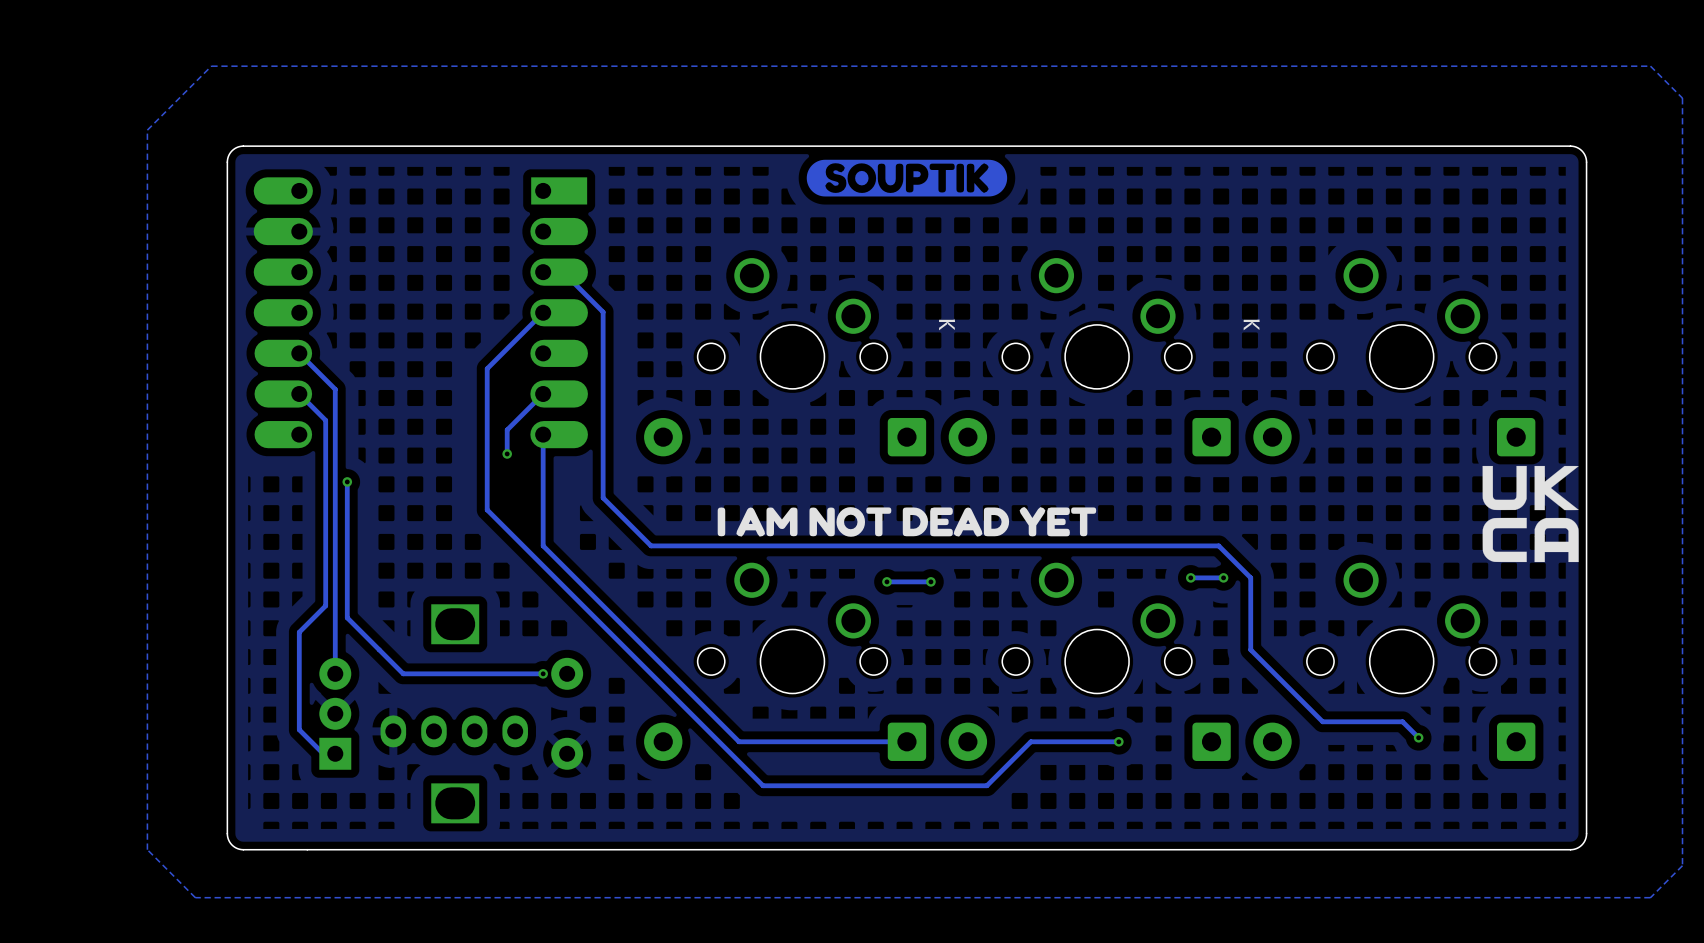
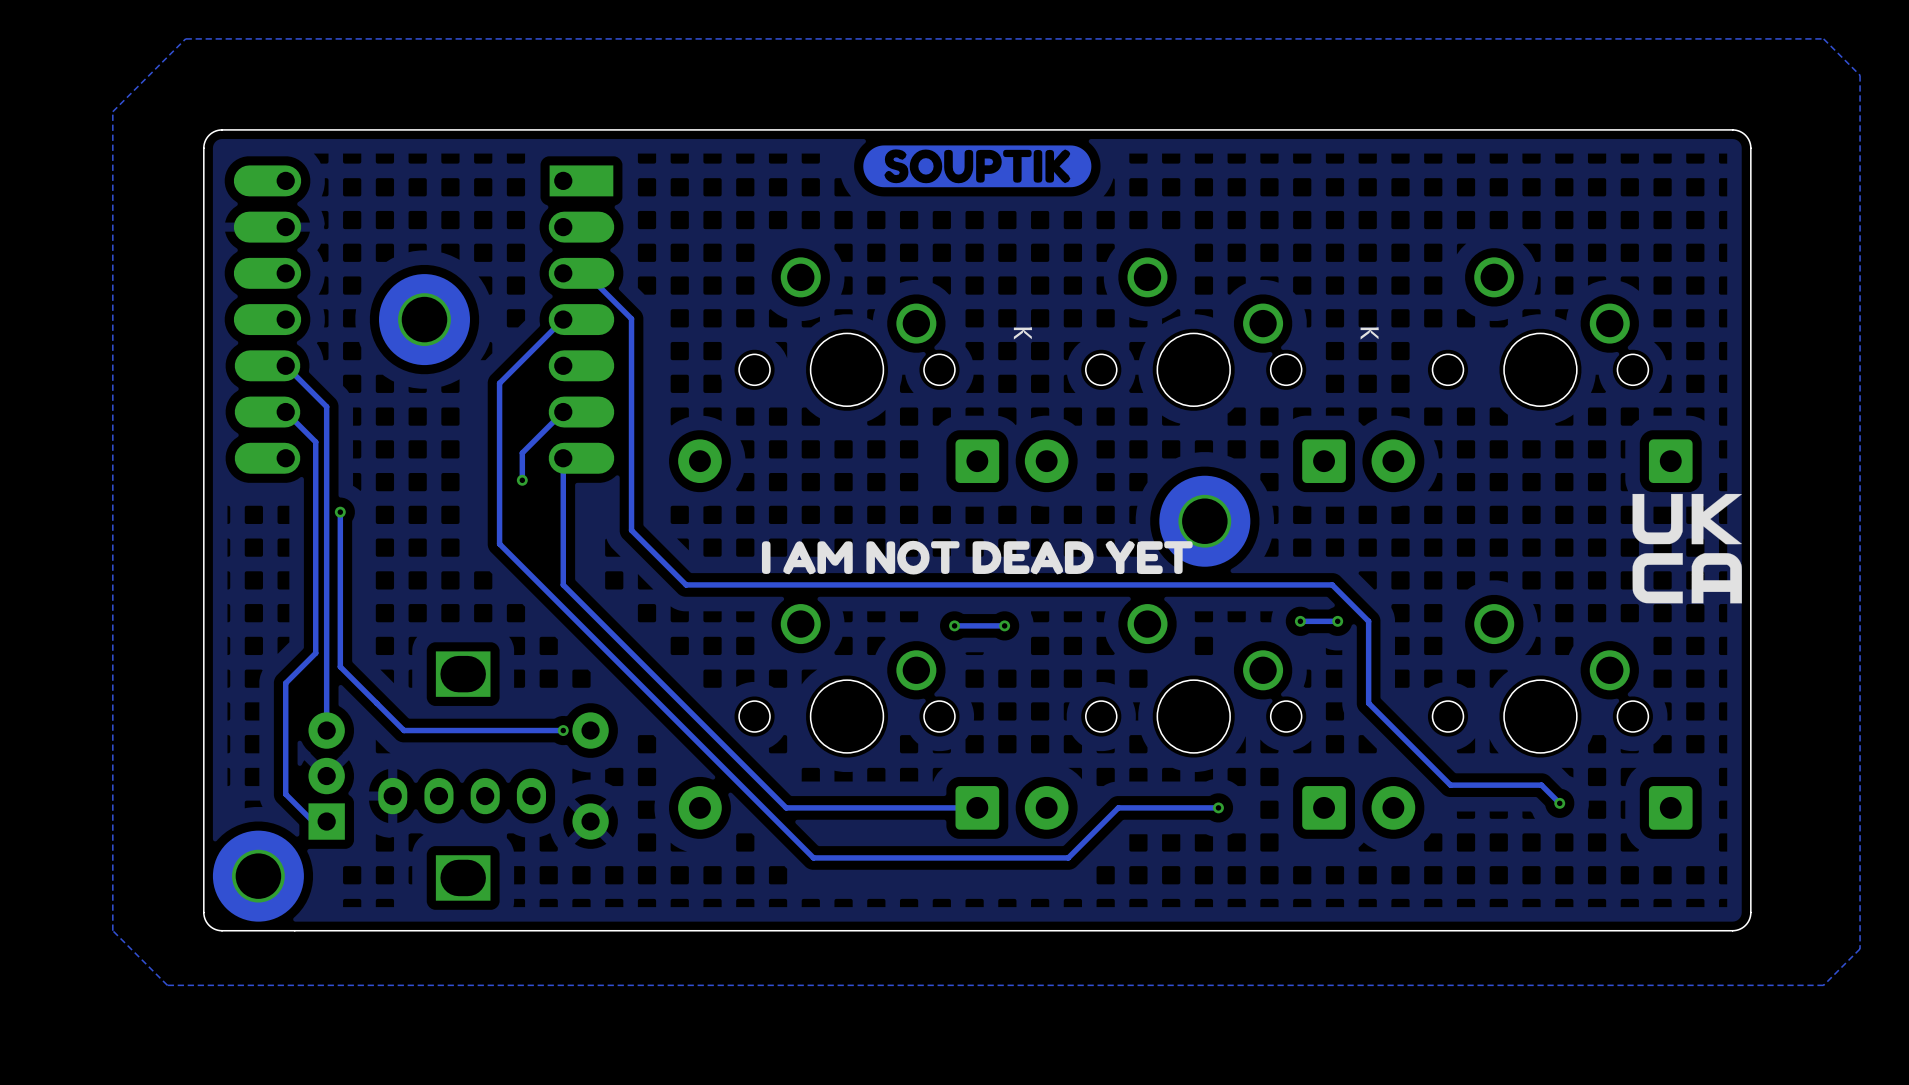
part: none -> (424, 319)
part: none -> (1204, 521)
part: none -> (258, 876)

